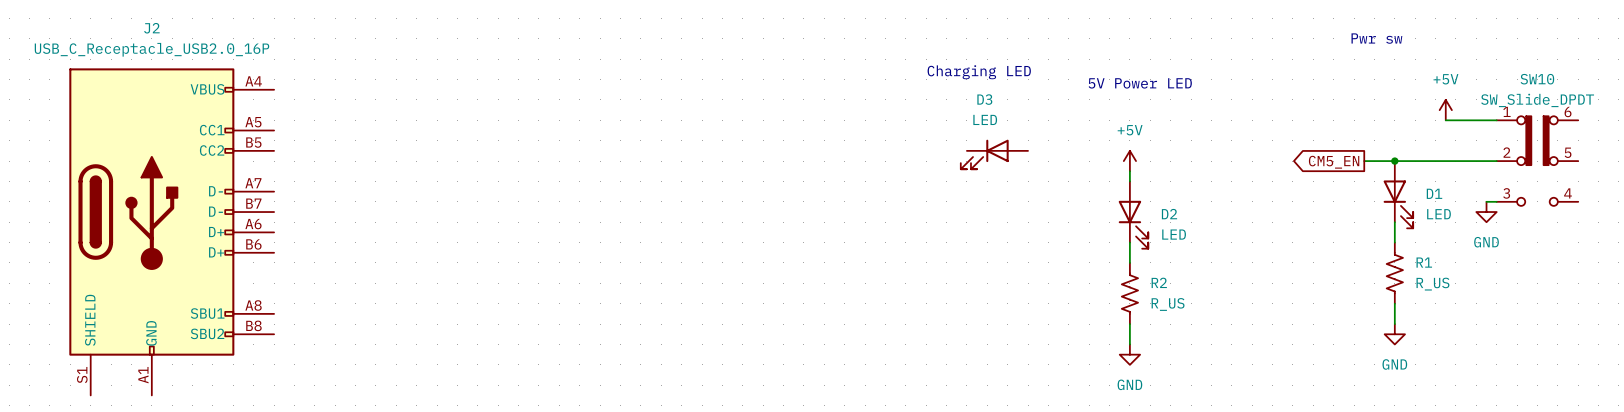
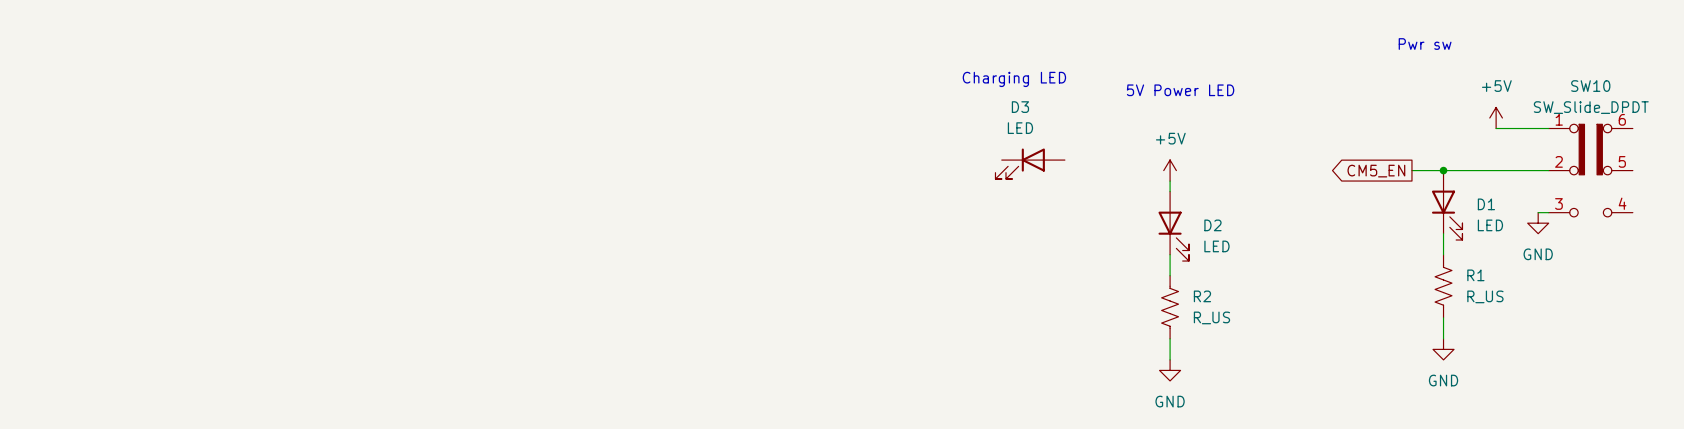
J2: USB_C_Receptacle_USB2.0_16P (171, 231) -> none

